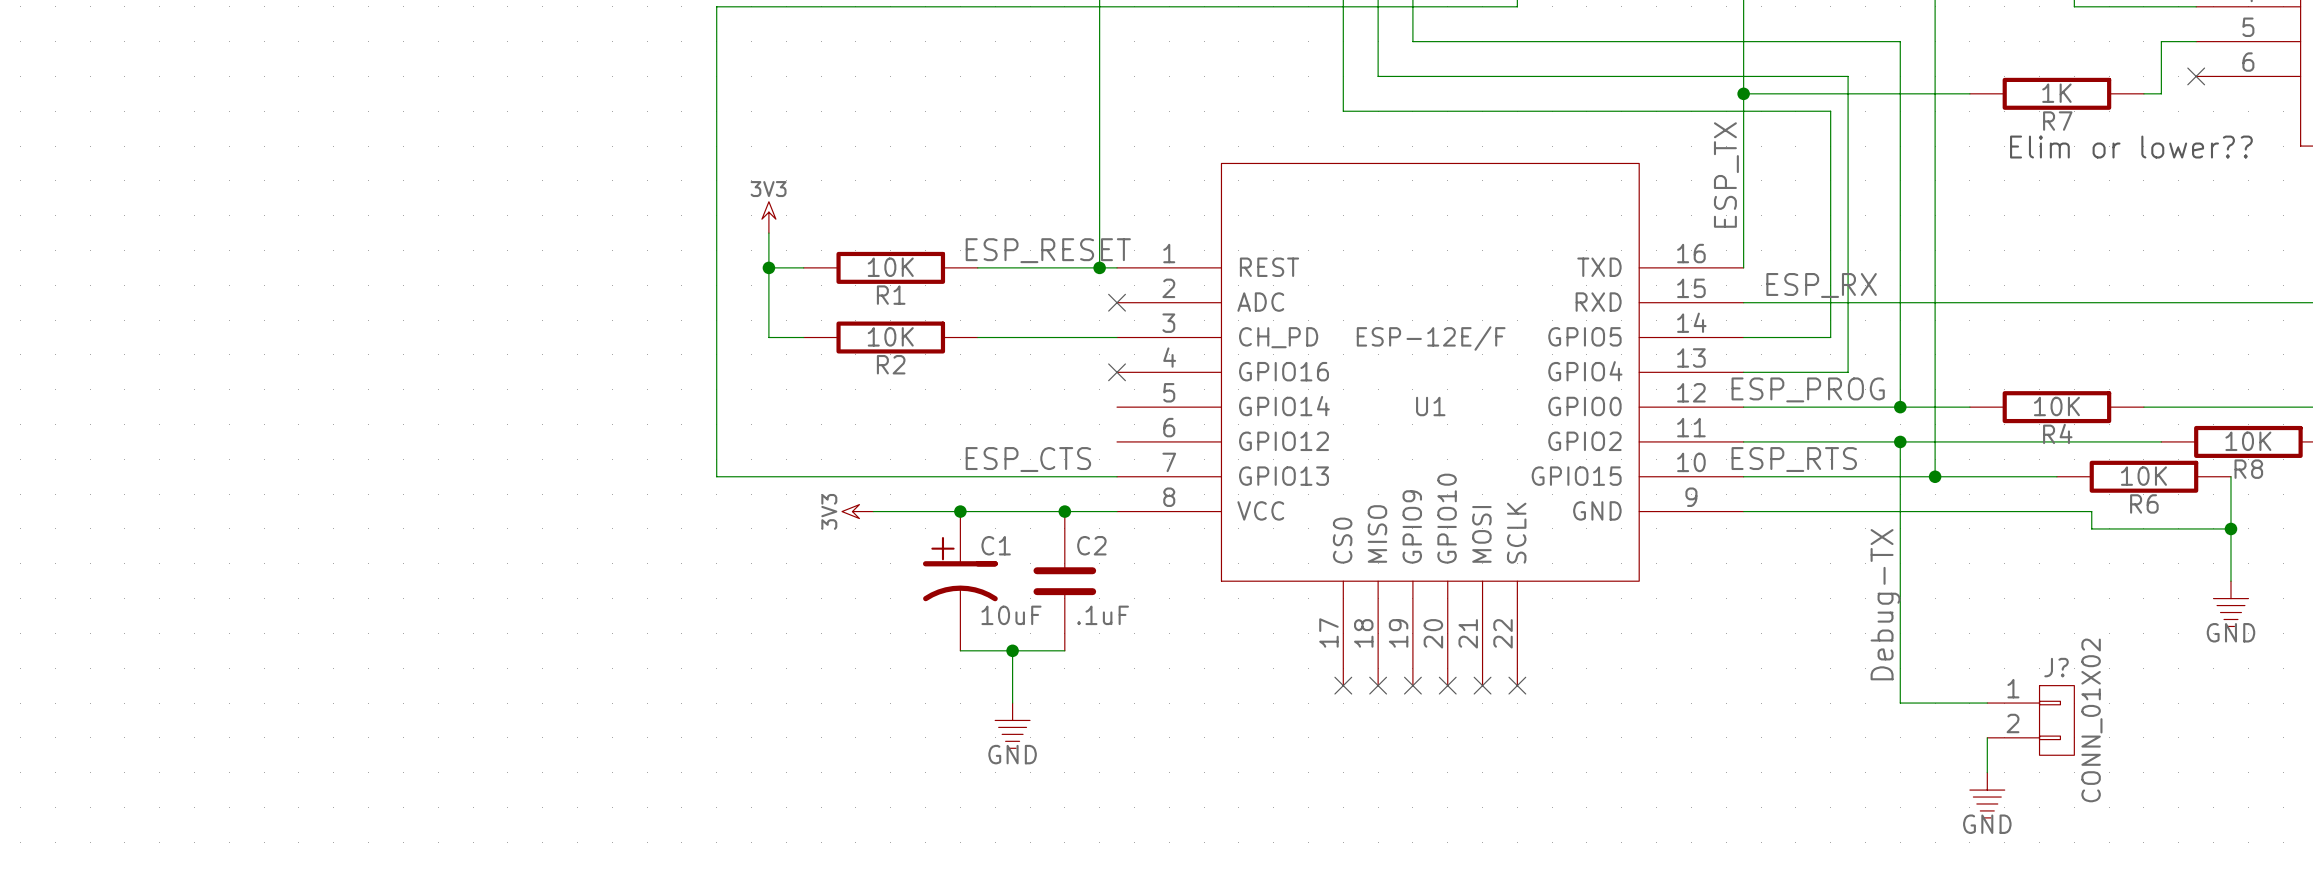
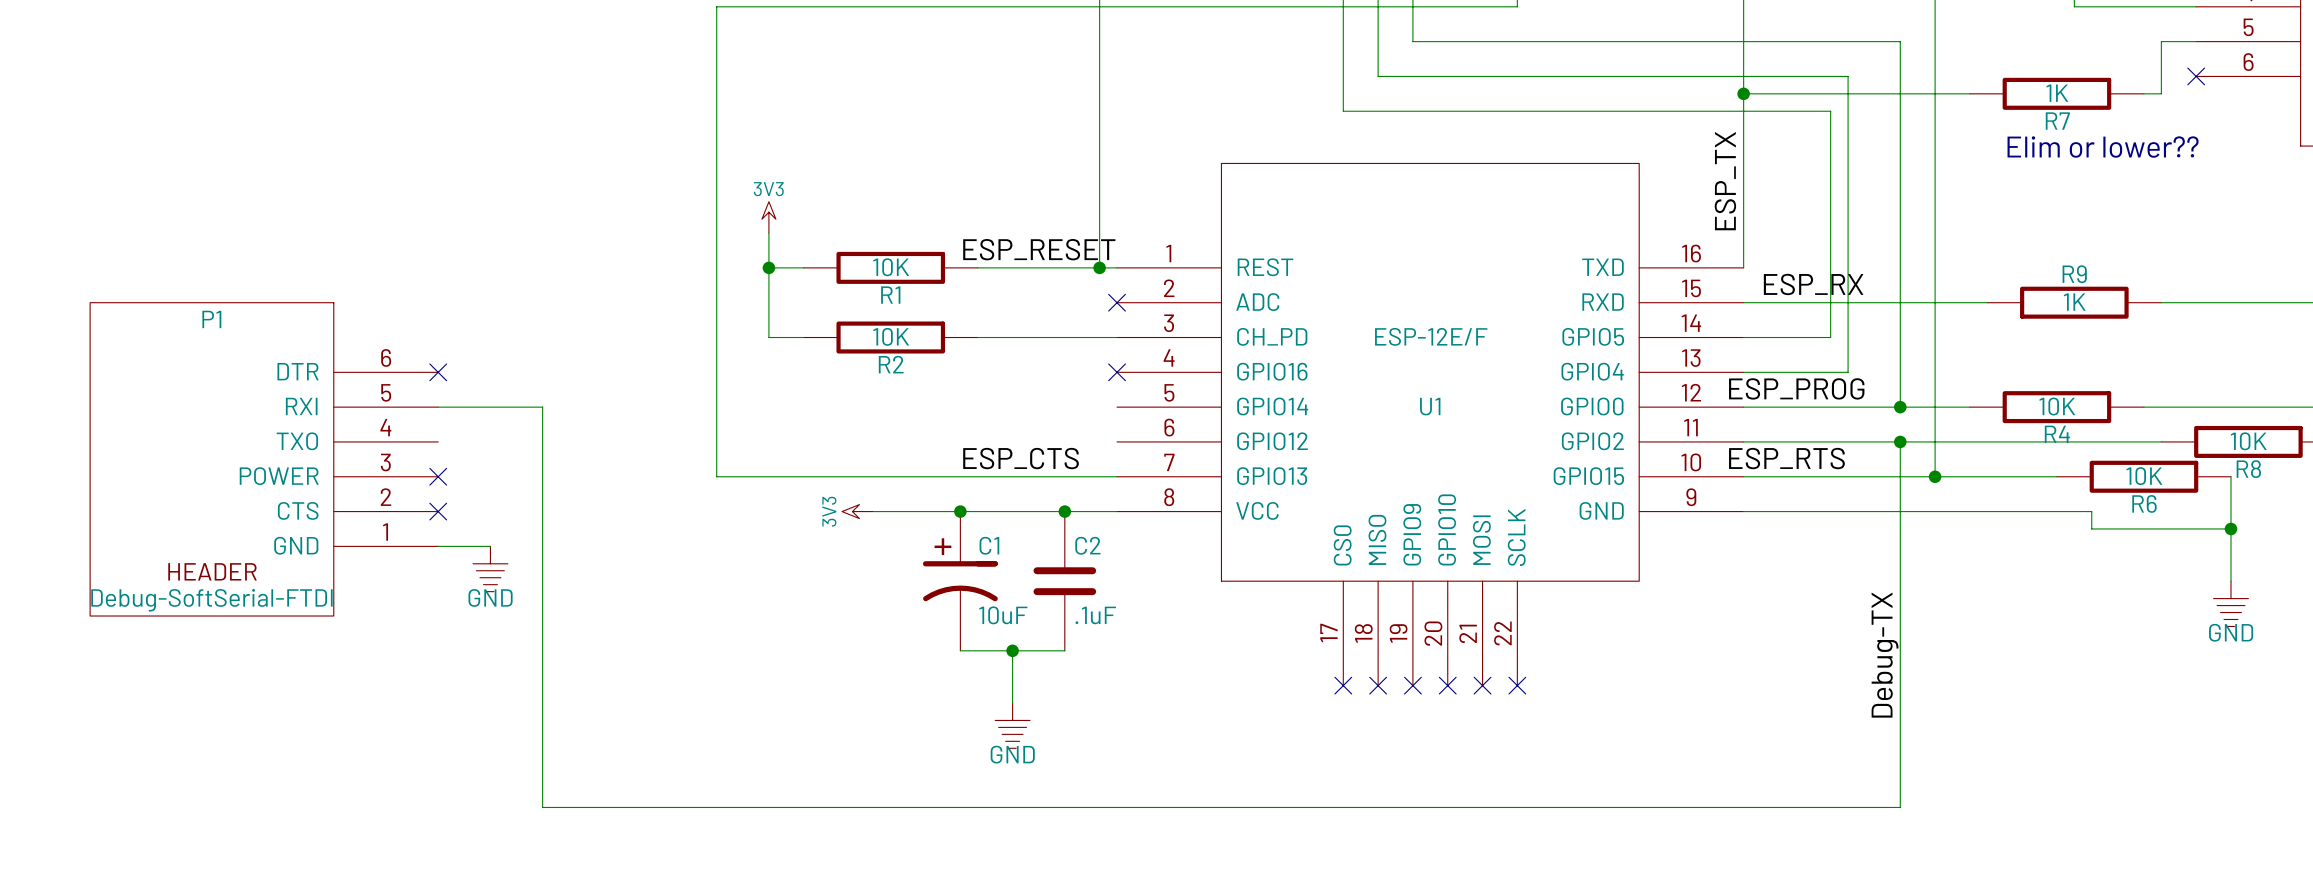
wire: (1987, 302) (2161, 302) -> none
R9: none -> 1K (2074, 302)
no-connect mark: none -> (438, 372)
P1: none -> Debug-SoftSerial-FTDI (264, 459)
no-connect mark: none -> (438, 476)
no-connect mark: none -> (438, 511)
wire: none -> (438, 546) (490, 546)
power symbol: none -> GND (490, 569)
label position: Debug-TX (1885, 604) -> Debug-TX (1885, 655)
wire: (1900, 703) (1987, 703) -> (1900, 703) (1900, 807) (542, 807) (542, 407) (438, 407)
J?: CONN_01X02 (2030, 720) -> none
wire: (1987, 737) (1987, 772) -> none
power symbol: GND (1987, 795) -> none

